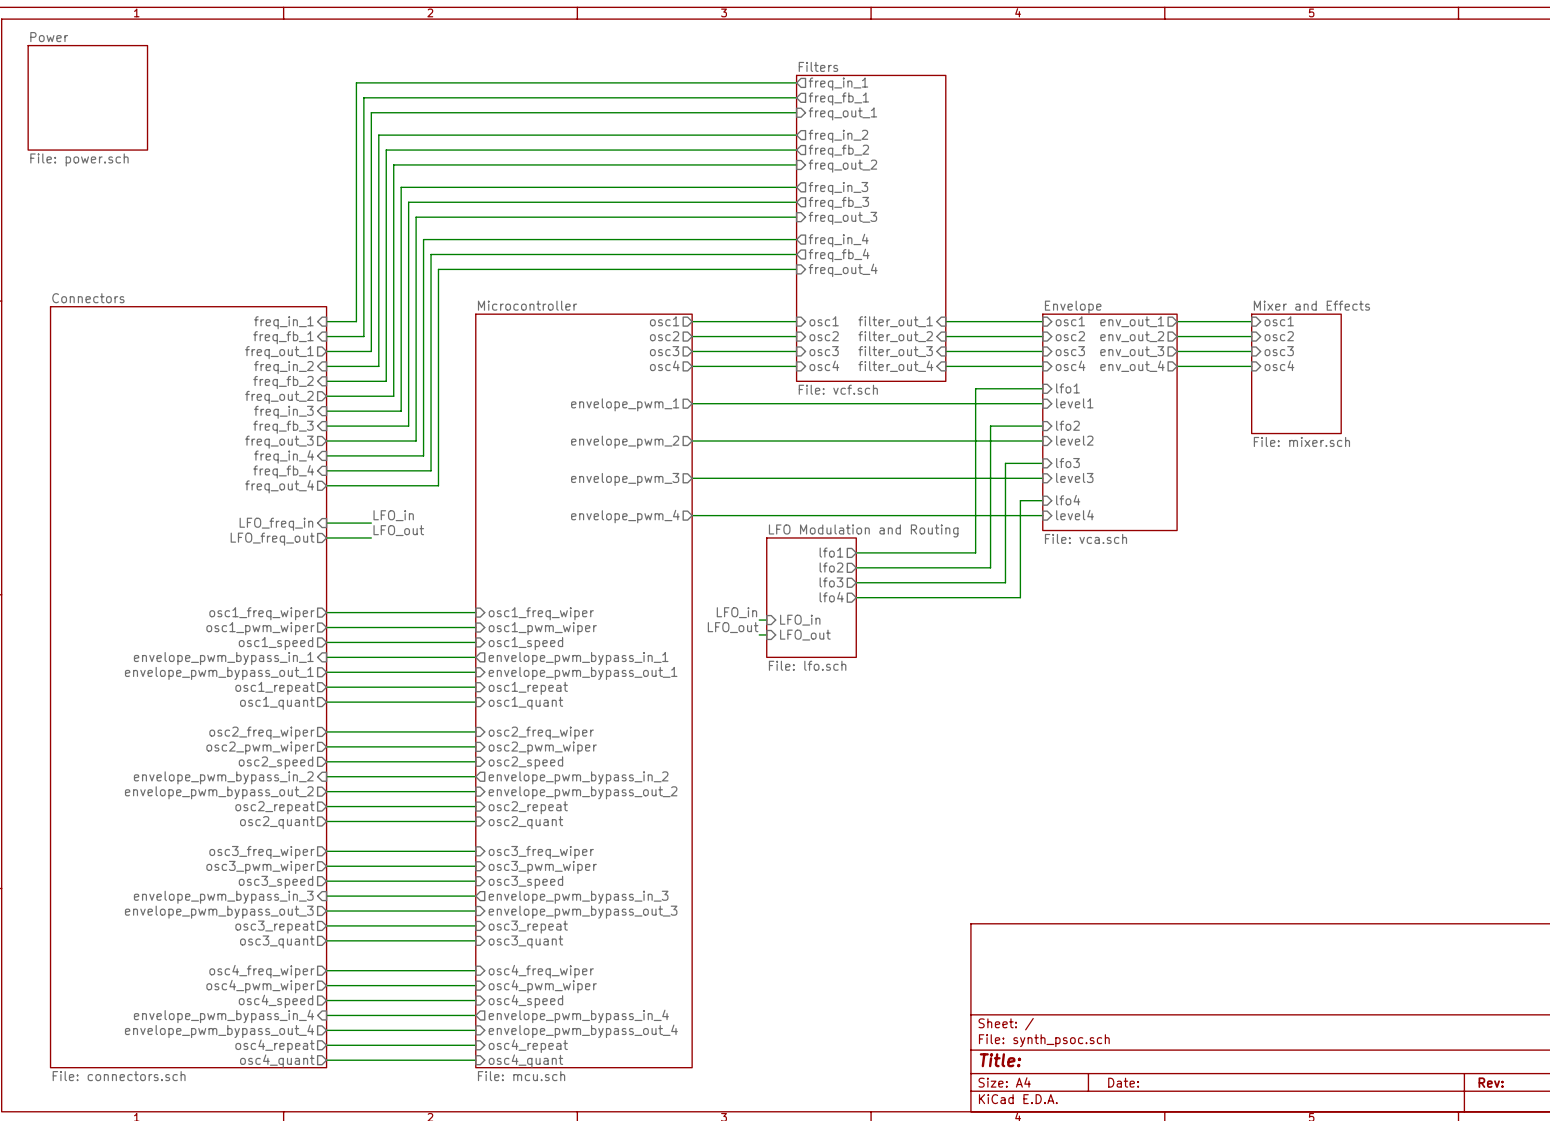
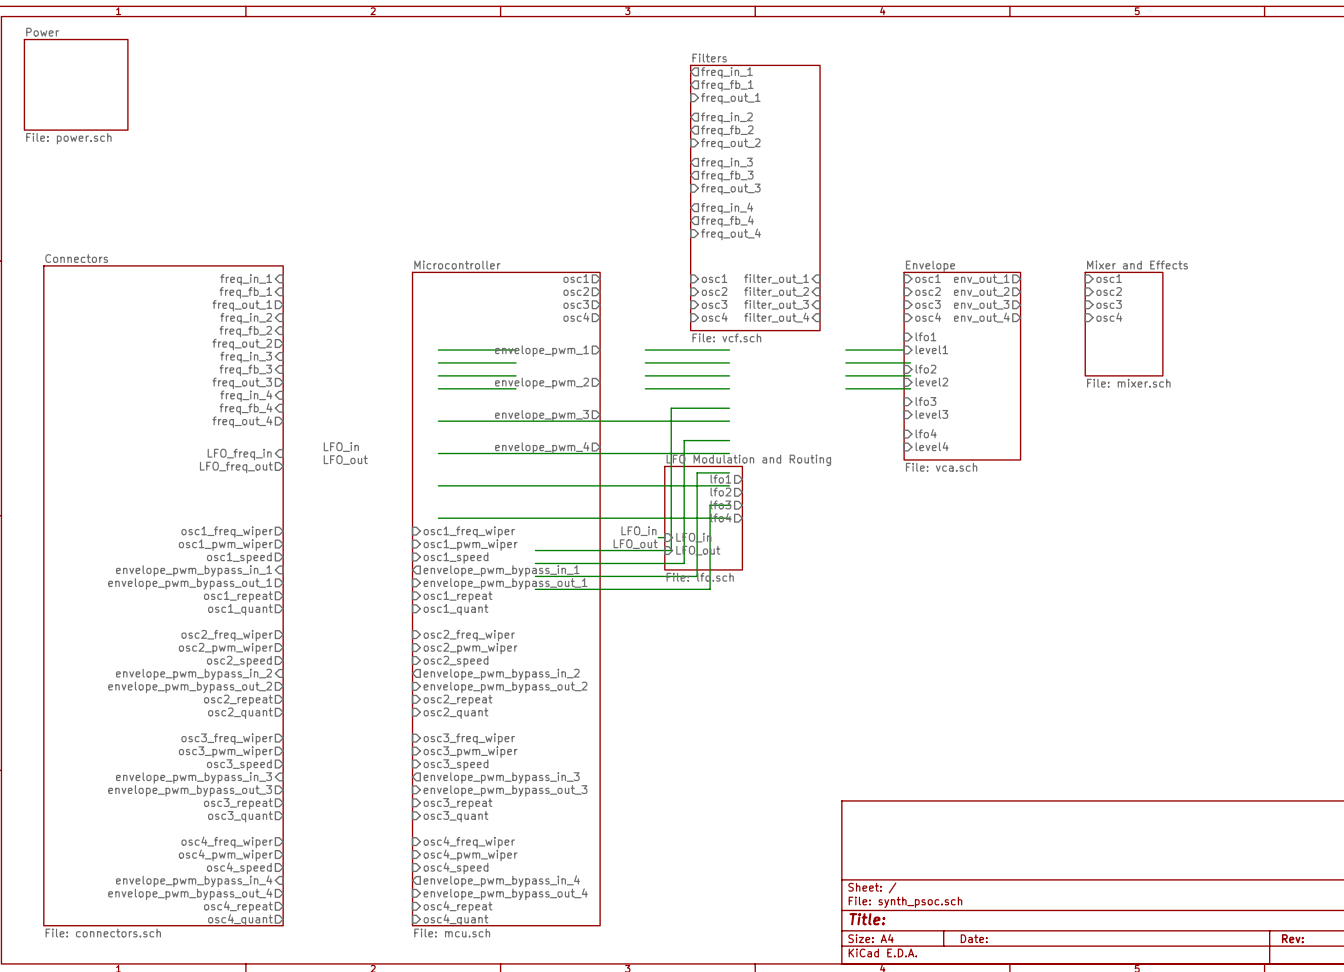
wire: (796, 82) (356, 82) (356, 321) (326, 321) -> none
wire: (796, 97) (363, 97) (363, 336) (326, 336) -> none
wire: (796, 112) (371, 112) (371, 351) (326, 351) -> none
wire: (796, 135) (378, 135) (378, 366) (326, 366) -> none
wire: (796, 150) (386, 150) (386, 381) (326, 381) -> none
wire: (796, 164) (393, 164) (393, 396) (326, 396) -> none
wire: (796, 187) (401, 187) (401, 411) (326, 411) -> none
wire: (796, 202) (408, 202) (408, 426) (326, 426) -> none
wire: (796, 217) (416, 217) (416, 441) (326, 441) -> none
wire: (796, 239) (423, 239) (423, 455) (326, 455) -> none
wire: (796, 254) (431, 254) (431, 470) (326, 470) -> none
wire: (796, 269) (438, 269) (438, 485) (326, 485) -> none
wire: (692, 321) (796, 321) -> none
wire: (945, 321) (1042, 321) -> none
wire: (1177, 321) (1251, 321) -> none
wire: (692, 336) (796, 336) -> none
wire: (945, 336) (1042, 336) -> none
wire: (1177, 336) (1251, 336) -> none
wire: (692, 351) (796, 351) -> none
wire: (945, 351) (1042, 351) -> none
wire: (1177, 351) (1251, 351) -> none
wire: (692, 366) (796, 366) -> none
wire: (945, 366) (1042, 366) -> none
wire: (1177, 366) (1251, 366) -> none
wire: (1042, 388) (975, 388) (975, 552) (856, 552) -> none
wire: none -> (438, 350) (516, 350)
wire: (692, 403) (744, 403) -> none
wire: (841, 403) (975, 403) -> none
wire: none -> (438, 362) (516, 362)
wire: none -> (645, 362) (729, 362)
wire: none -> (845, 362) (910, 362)
wire: (1042, 426) (990, 426) (990, 567) (856, 567) -> none
wire: none -> (438, 375) (516, 375)
wire: none -> (645, 375) (729, 375)
wire: none -> (845, 375) (910, 375)
wire: (692, 441) (1042, 441) -> none
wire: none -> (438, 388) (516, 388)
wire: none -> (645, 388) (729, 388)
wire: none -> (845, 388) (910, 388)
wire: (1042, 463) (1005, 463) (1005, 582) (856, 582) -> none
wire: none -> (729, 408) (671, 408) (671, 550) (664, 550)
wire: (692, 478) (1042, 478) -> none
wire: none -> (438, 421) (729, 421)
wire: (1042, 500) (1020, 500) (1020, 597) (856, 597) -> none
wire: none -> (729, 440) (684, 440) (684, 563) (535, 563)
wire: (692, 515) (1042, 515) -> none
wire: (326, 523) (371, 523) -> none
wire: none -> (438, 453) (729, 453)
wire: (326, 537) (371, 537) -> none
wire: none -> (729, 472) (697, 472) (697, 576) (535, 576)
wire: none -> (438, 485) (729, 485)
wire: none -> (729, 505) (710, 505) (710, 589) (535, 589)
wire: none -> (438, 518) (729, 518)
wire: (326, 612) (475, 612) -> none
wire: (326, 627) (475, 627) -> none
wire: none -> (535, 550) (658, 550)
wire: (326, 642) (475, 642) -> none
wire: (326, 657) (475, 657) -> none
wire: (326, 672) (475, 672) -> none
wire: (326, 687) (475, 687) -> none
wire: (326, 702) (475, 702) -> none
wire: (326, 731) (475, 731) -> none
wire: (326, 746) (475, 746) -> none
wire: (326, 761) (475, 761) -> none
wire: (326, 776) (475, 776) -> none
wire: (326, 791) (475, 791) -> none
wire: (326, 806) (475, 806) -> none
wire: (326, 821) (475, 821) -> none
wire: (326, 851) (475, 851) -> none
wire: (326, 866) (475, 866) -> none
wire: (326, 881) (475, 881) -> none
wire: (326, 896) (475, 896) -> none
wire: (326, 911) (475, 911) -> none
wire: (326, 925) (475, 925) -> none
wire: (326, 940) (475, 940) -> none
wire: (326, 970) (475, 970) -> none
wire: (326, 985) (475, 985) -> none
wire: (326, 1000) (475, 1000) -> none
wire: (326, 1015) (475, 1015) -> none
wire: (326, 1030) (475, 1030) -> none
wire: (326, 1045) (475, 1045) -> none
wire: (326, 1060) (475, 1060) -> none

